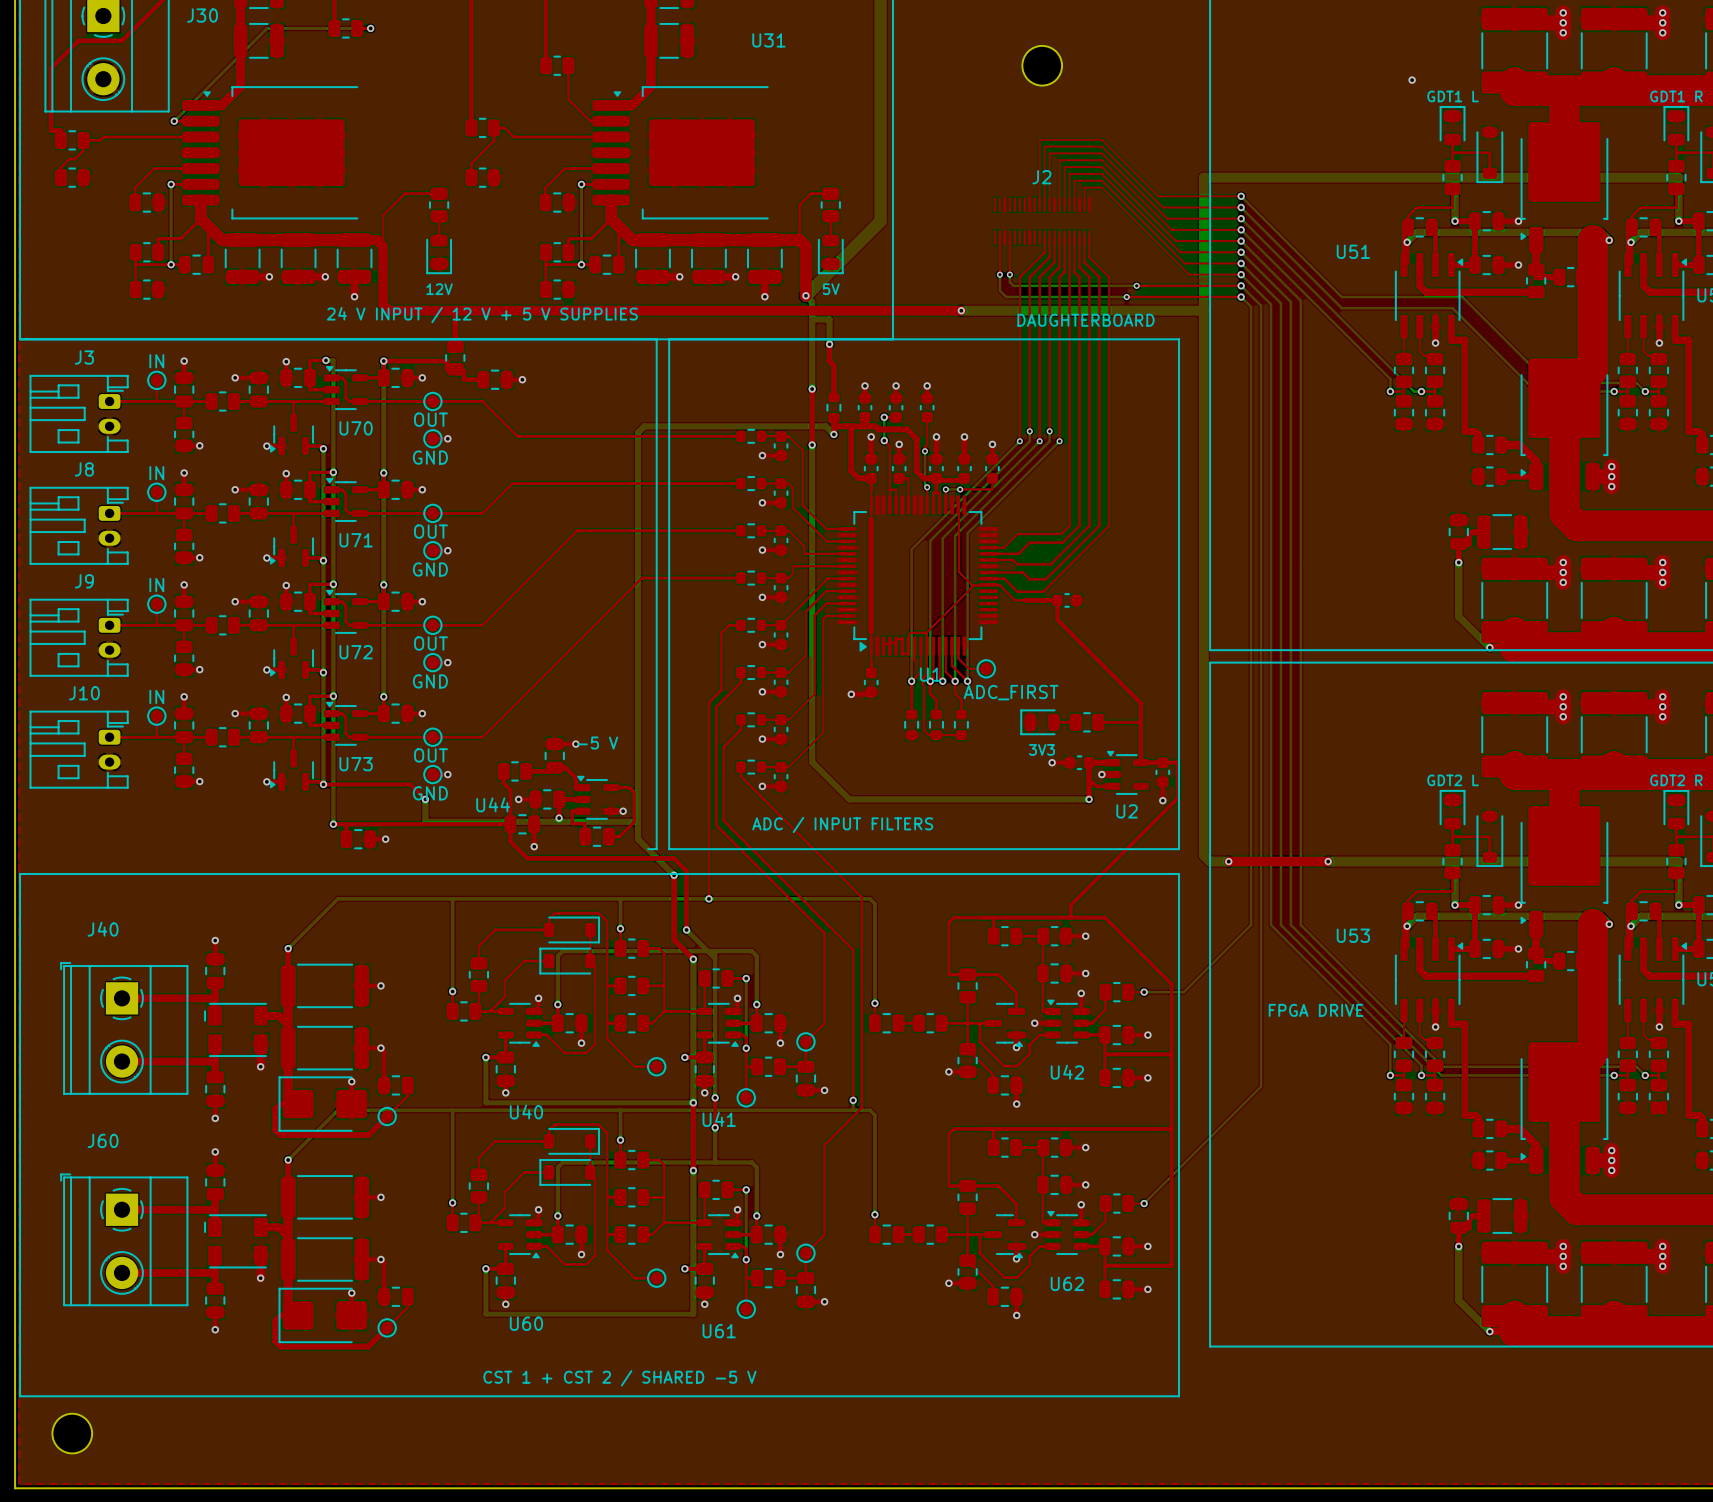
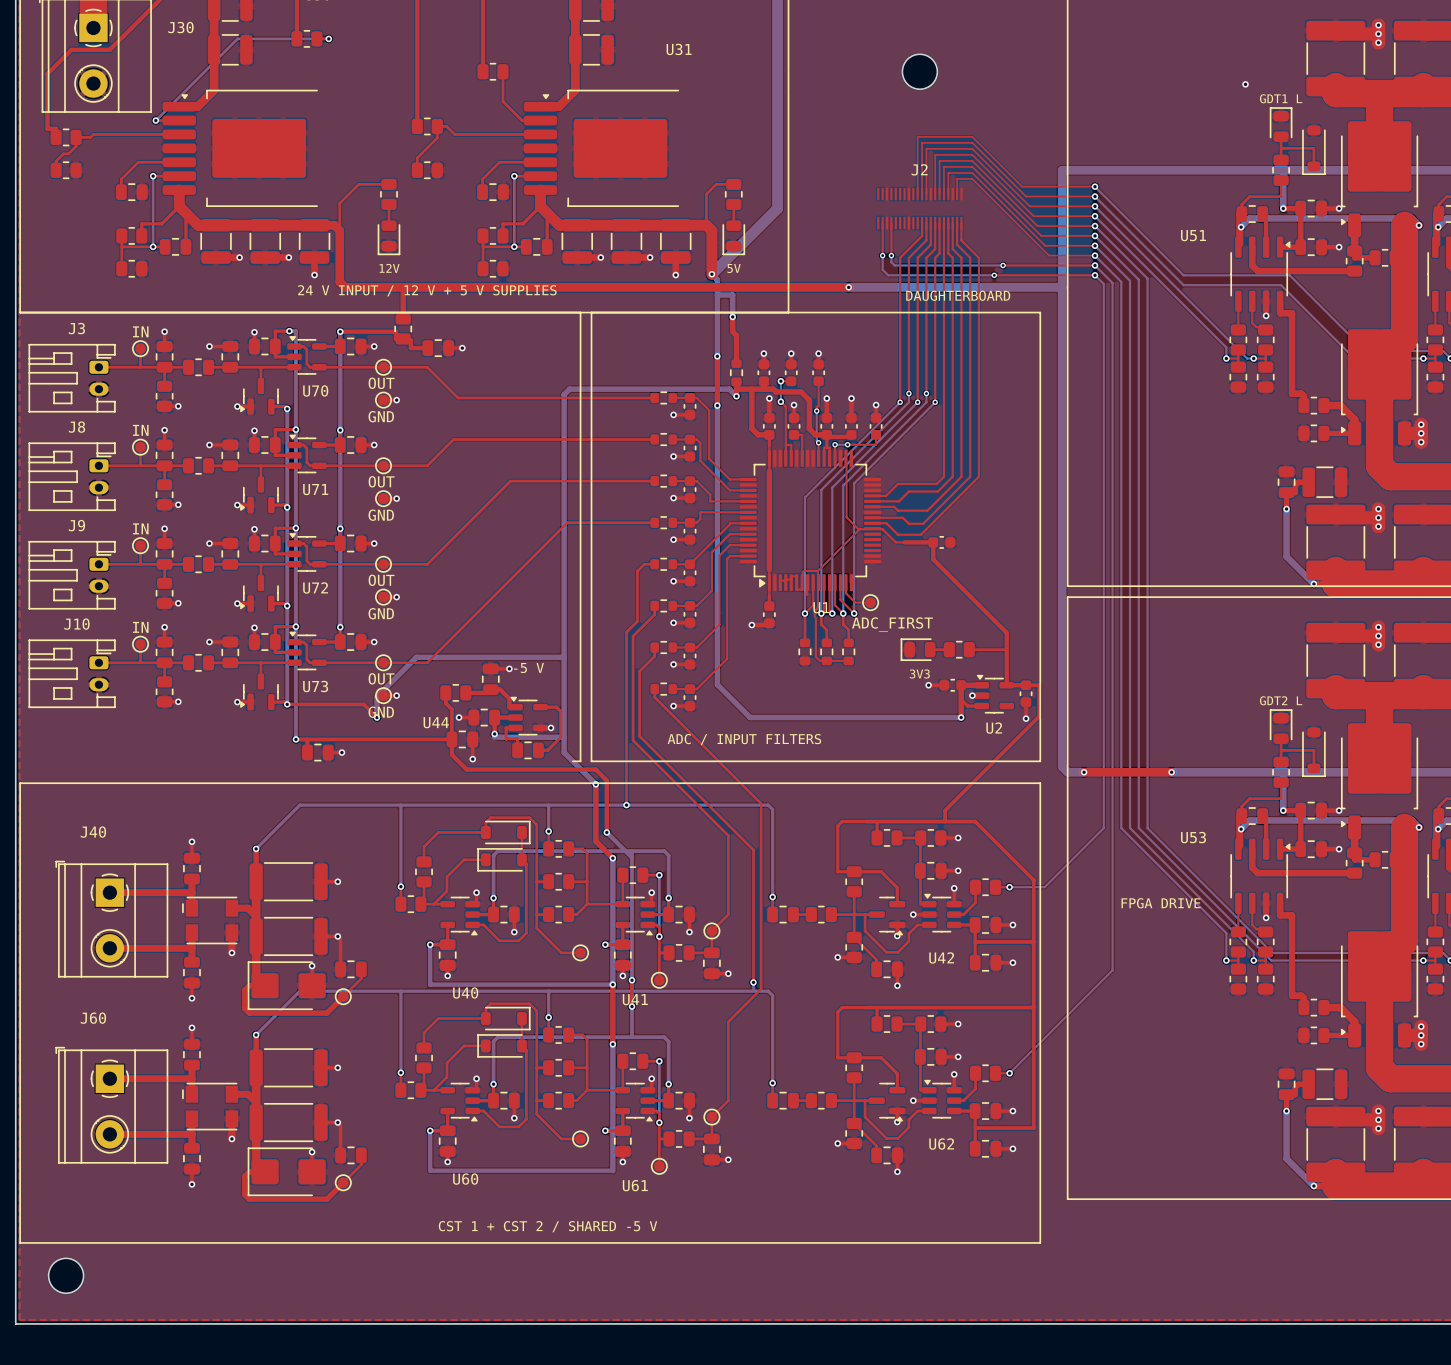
bottom track: (425, 799) (425, 821) (562, 821) -> (376, 717) (376, 696) (416, 657) (564, 657)

